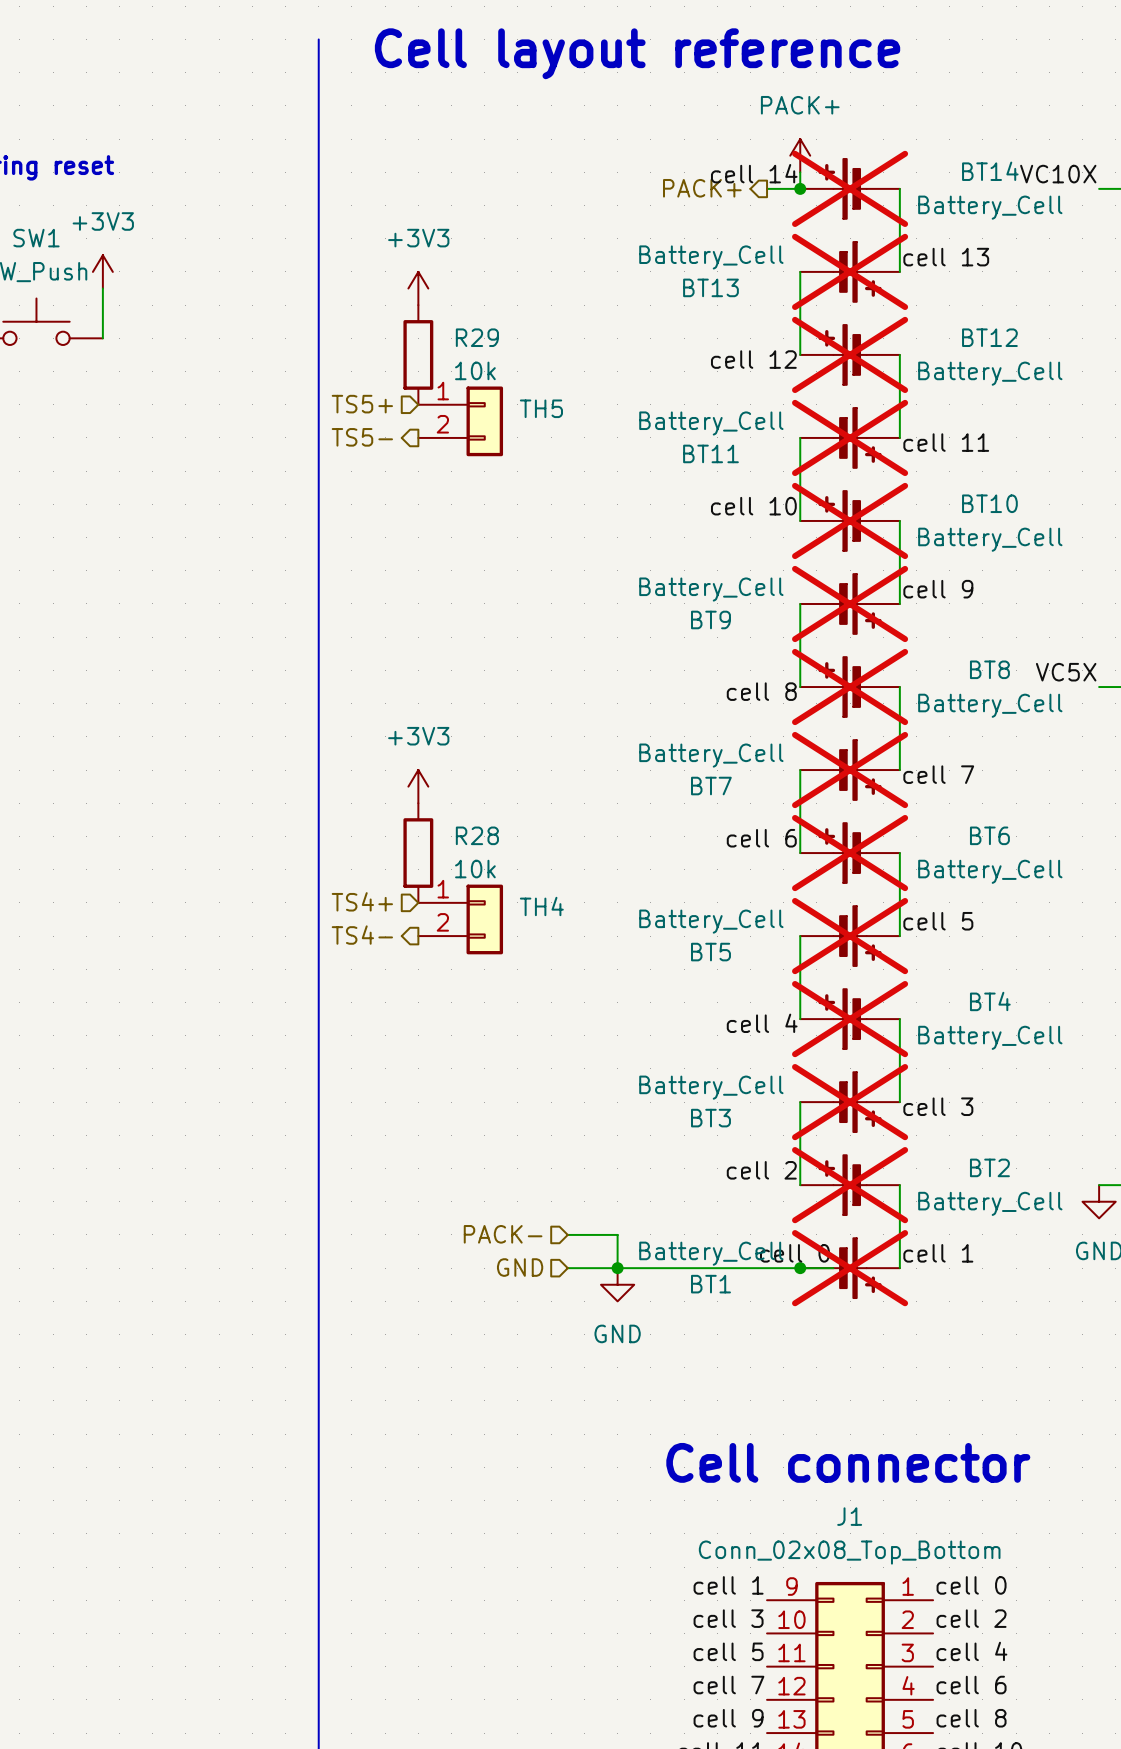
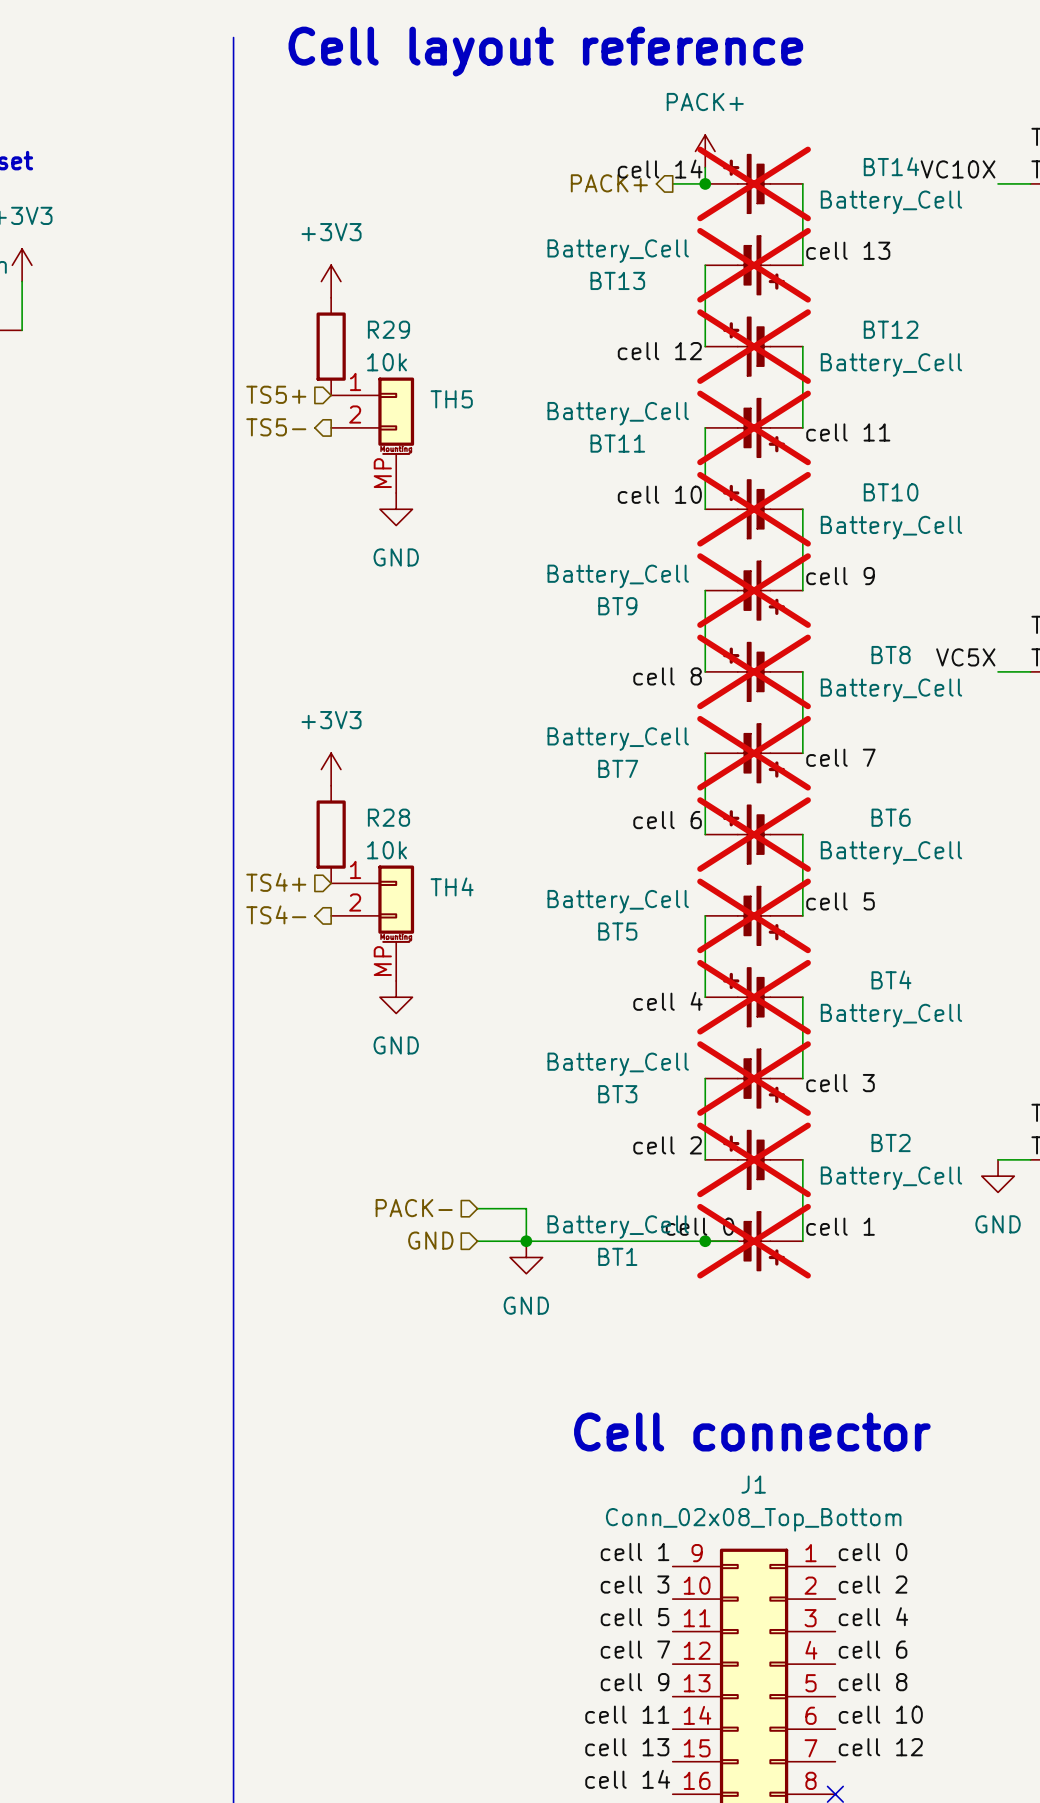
TH5 symbol: [418, 386, 504, 457] -> [331, 377, 415, 493]
power symbol: none -> GND (396, 509)
TH4 symbol: [418, 884, 504, 955] -> [331, 865, 415, 981]
power symbol: none -> GND (396, 997)

